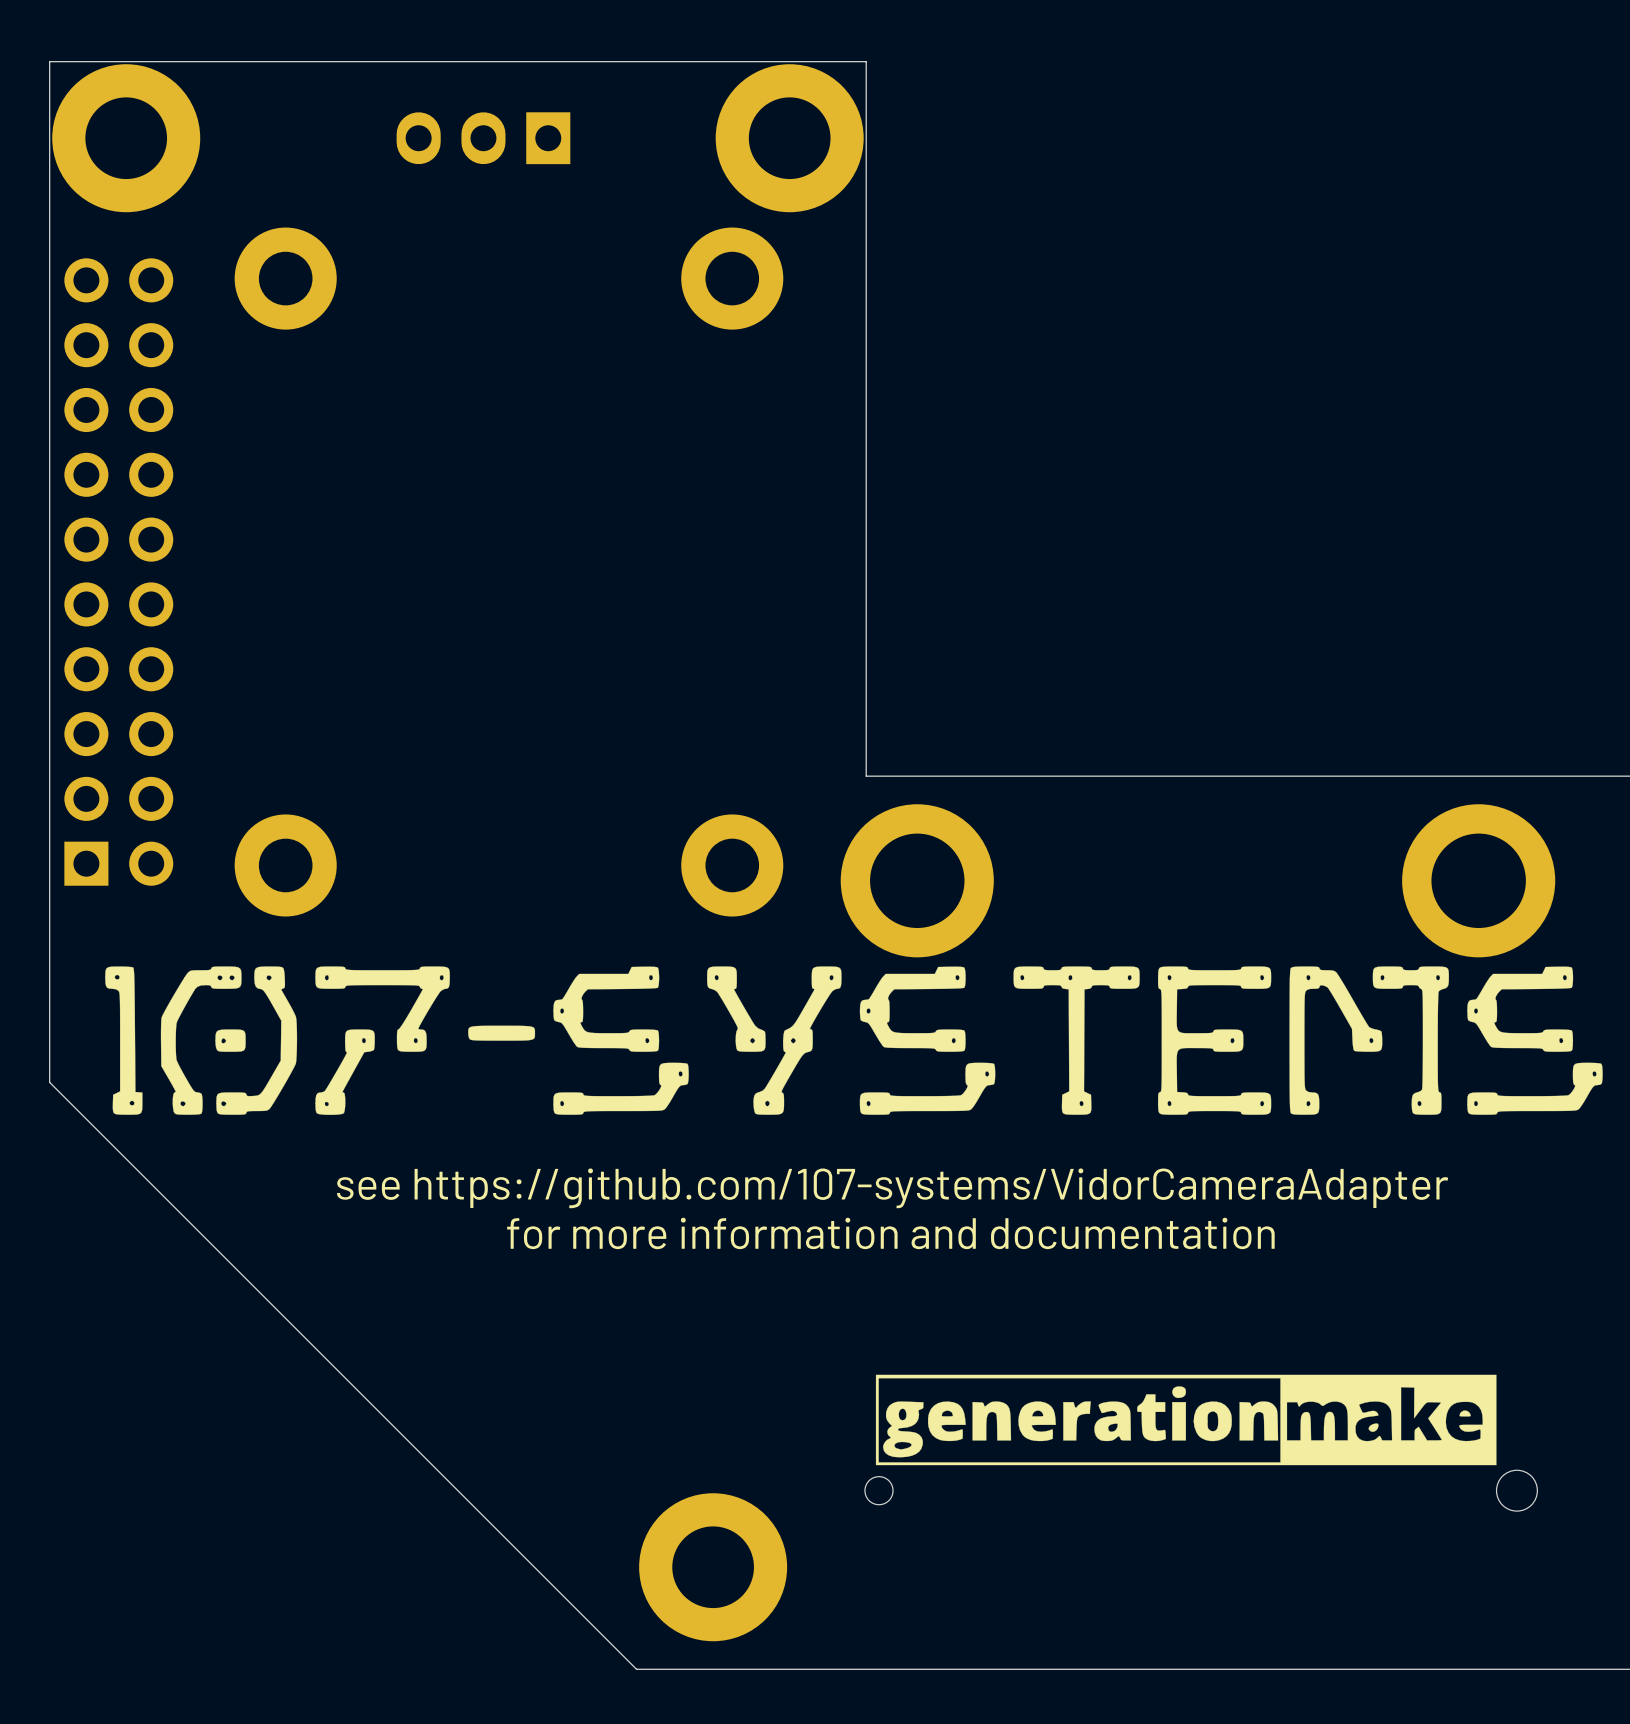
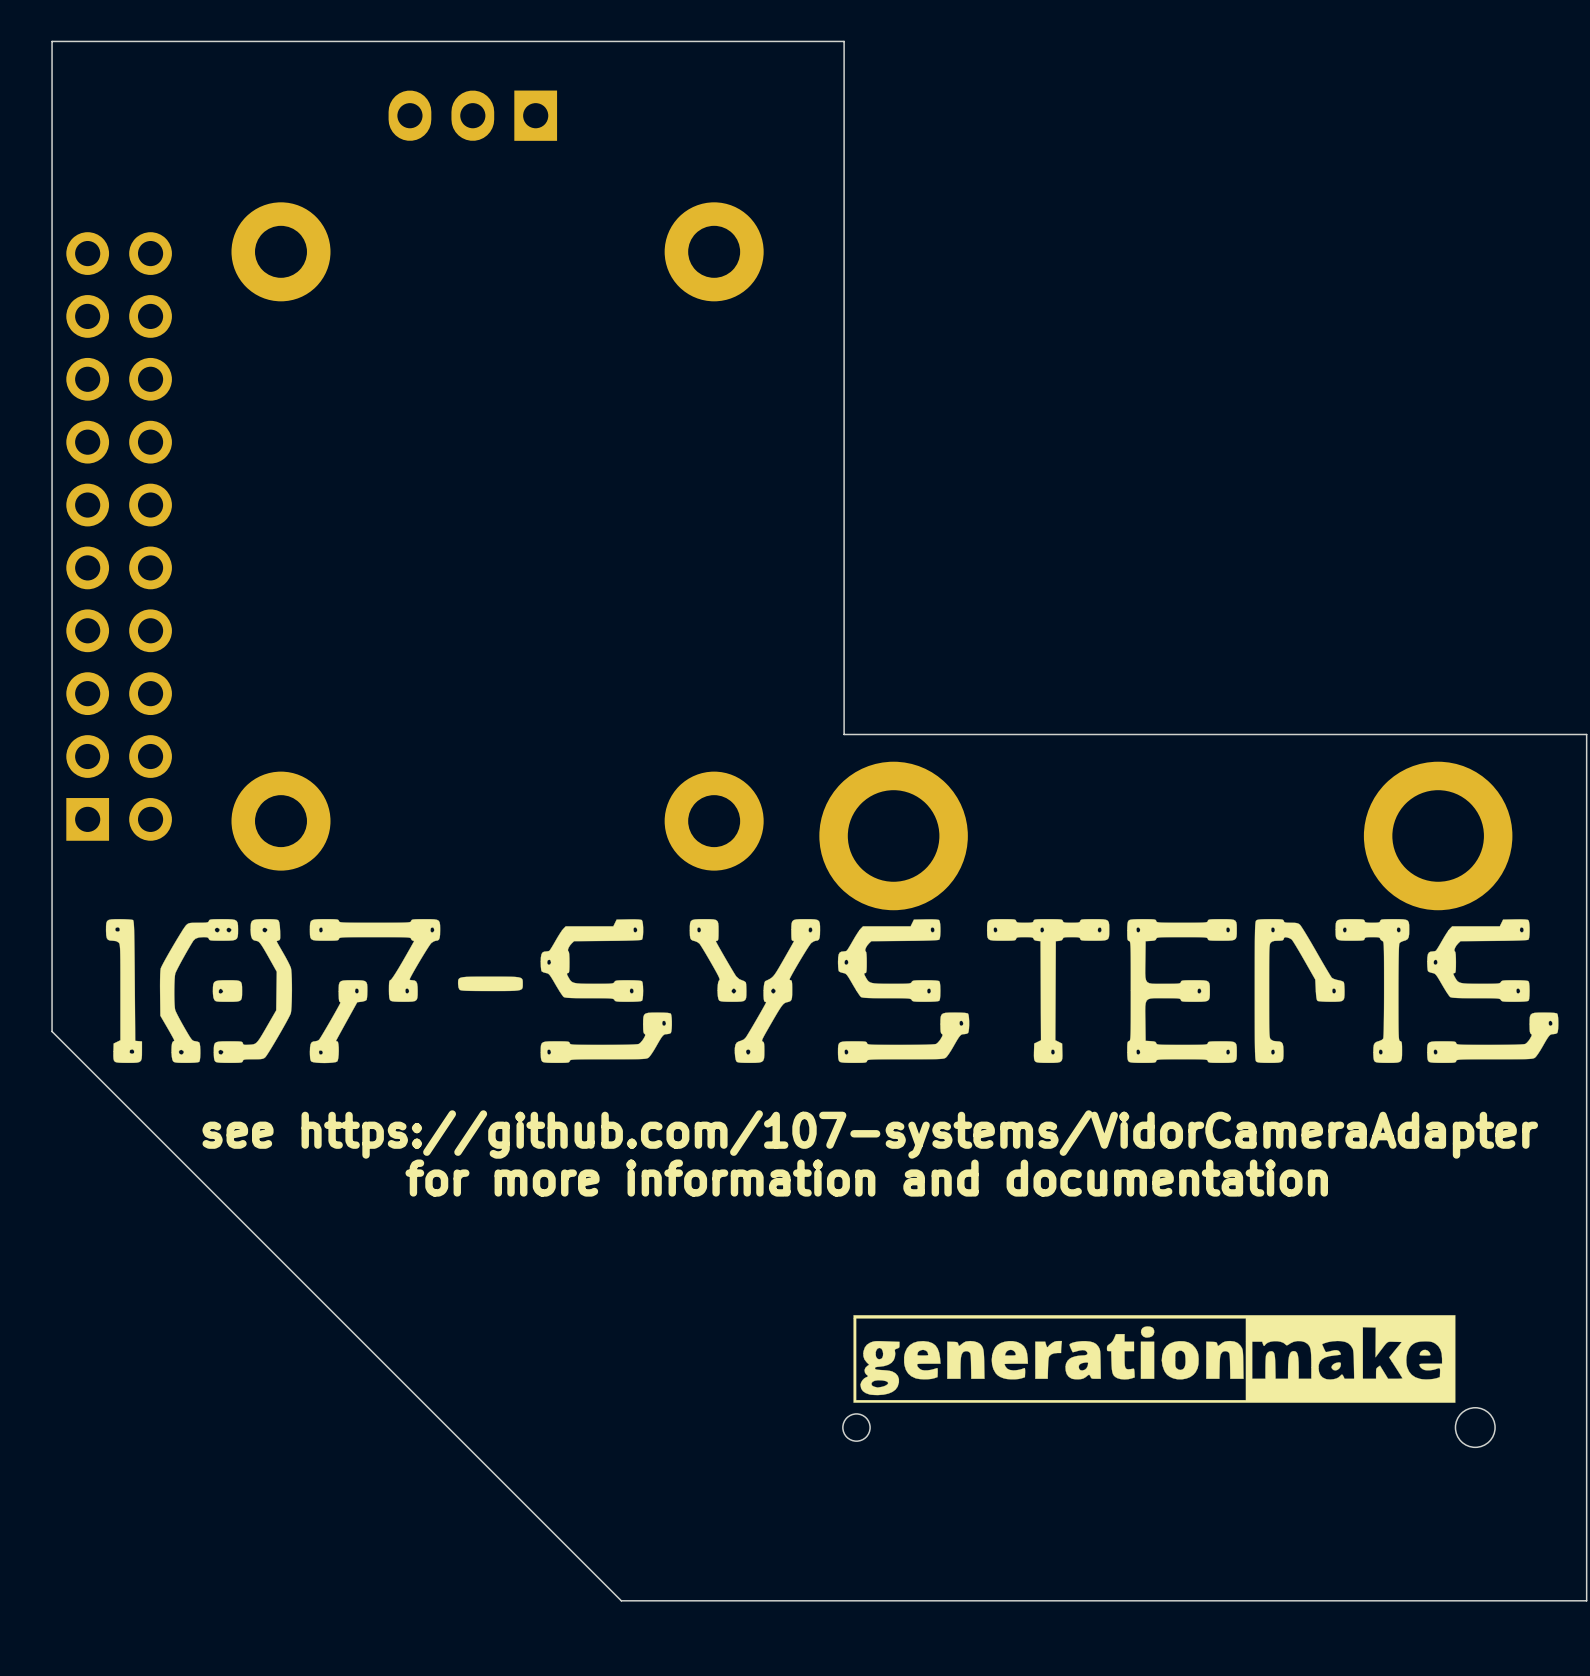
part: (126, 138) -> none
part: (789, 138) -> none
part: (713, 1567) -> none

